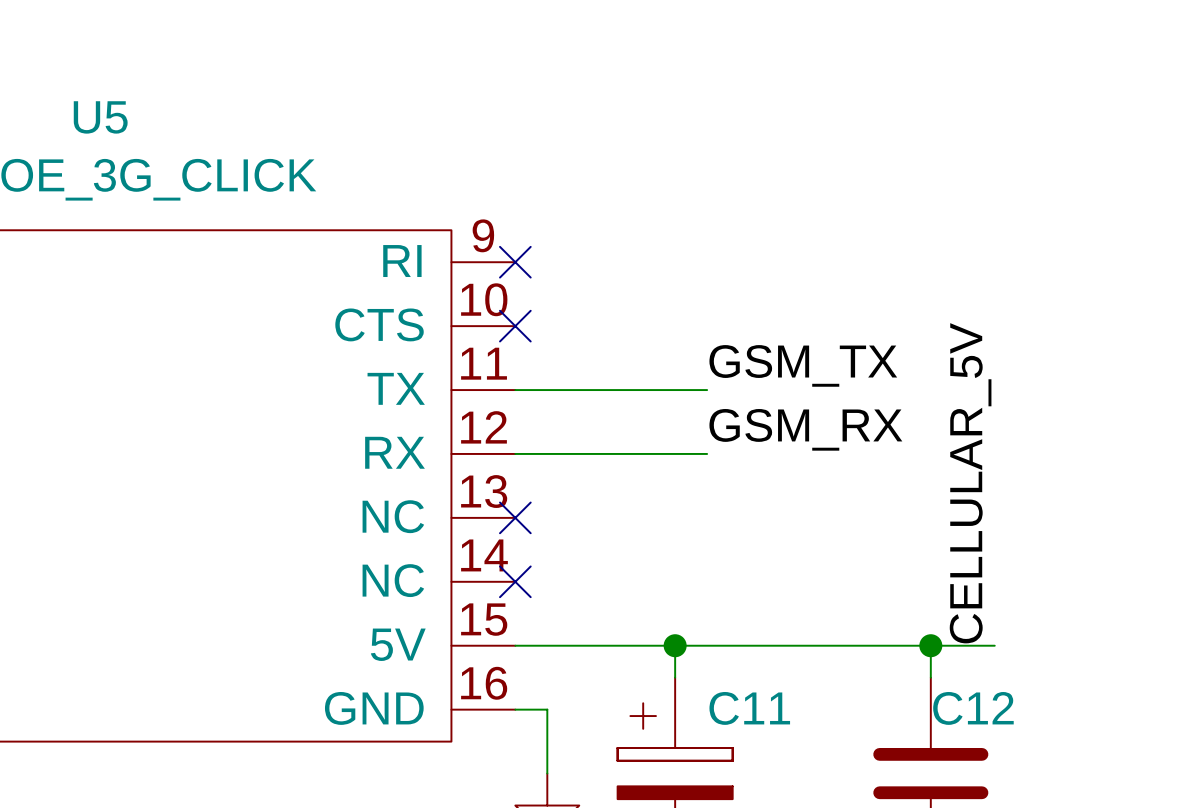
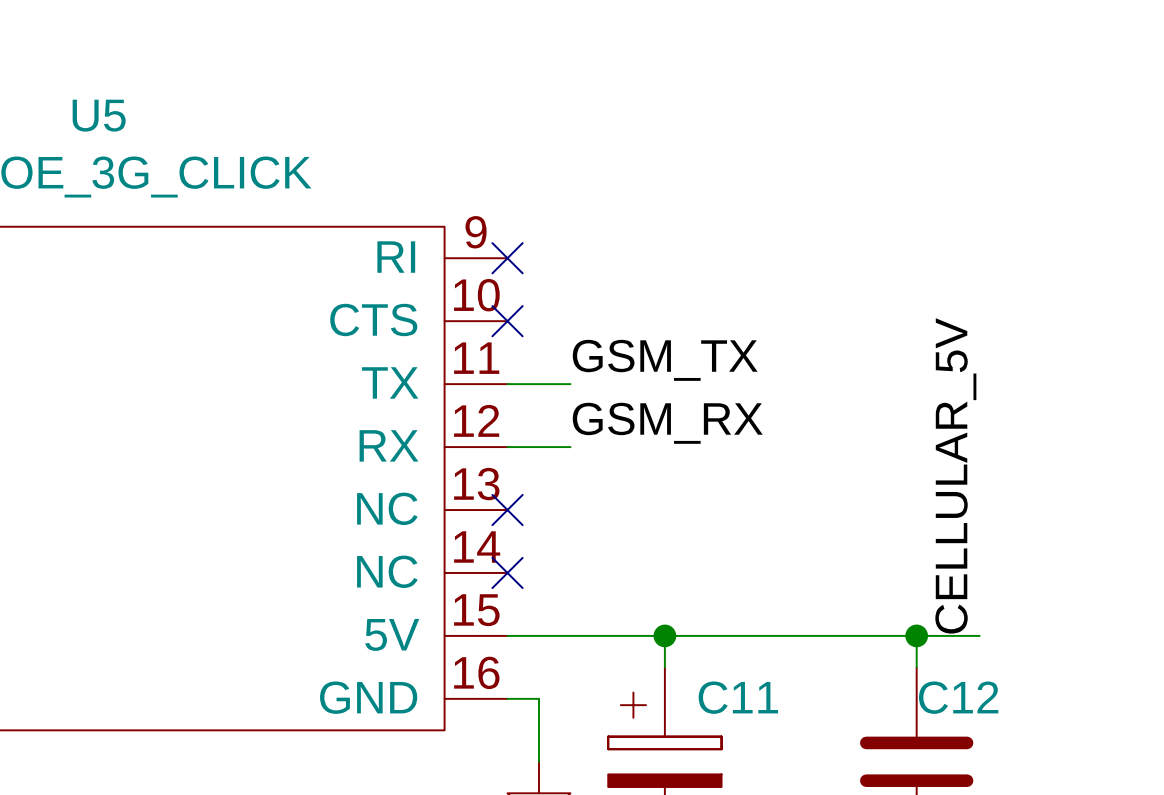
label position: GSM_TX (803, 365) -> GSM_TX (665, 360)
wire: (579, 390) (707, 390) -> none
label position: GSM_RX (805, 429) -> GSM_RX (667, 423)
wire: (579, 453) (707, 453) -> none

